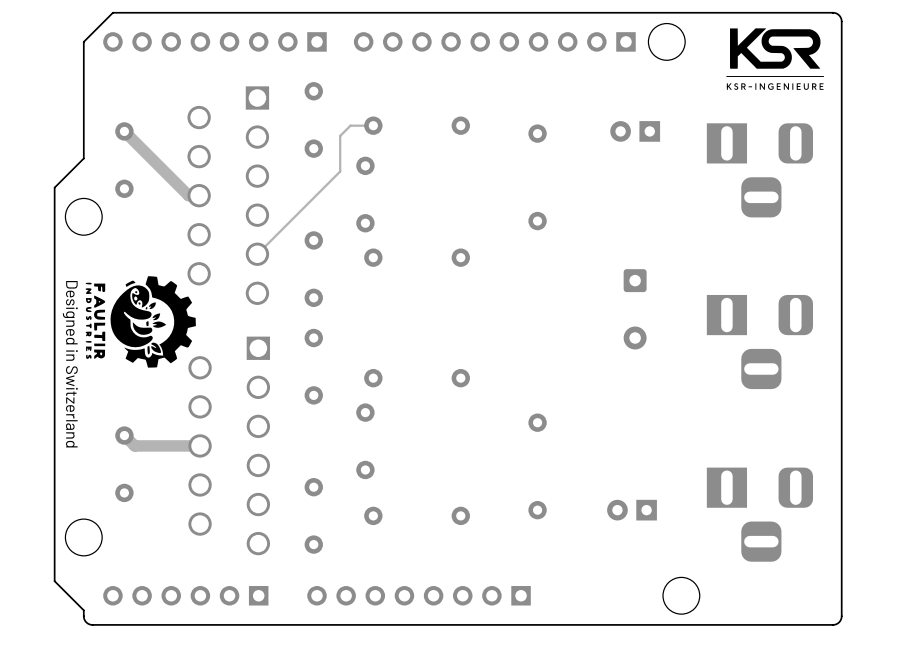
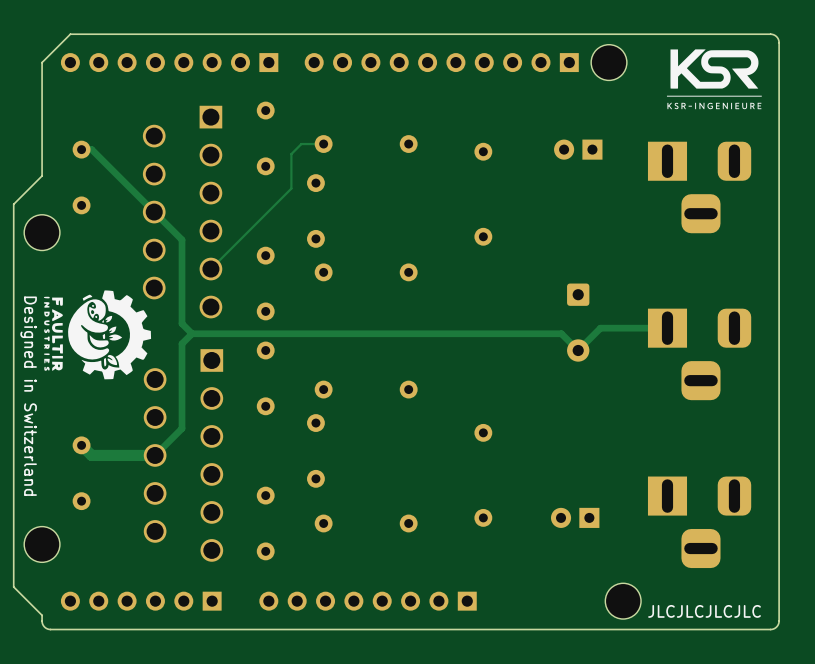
track: (124, 131) (188, 195) (199, 195) -> (81, 149) (91, 149) (182, 239) (182, 323) (192, 333)
track: none -> (667, 328) (600, 328) (578, 350) (561, 333) (192, 333)
track: none -> (192, 333) (182, 343) (182, 428) (155, 455)
text: none -> JLCJLCJLCJLC (704, 611)

